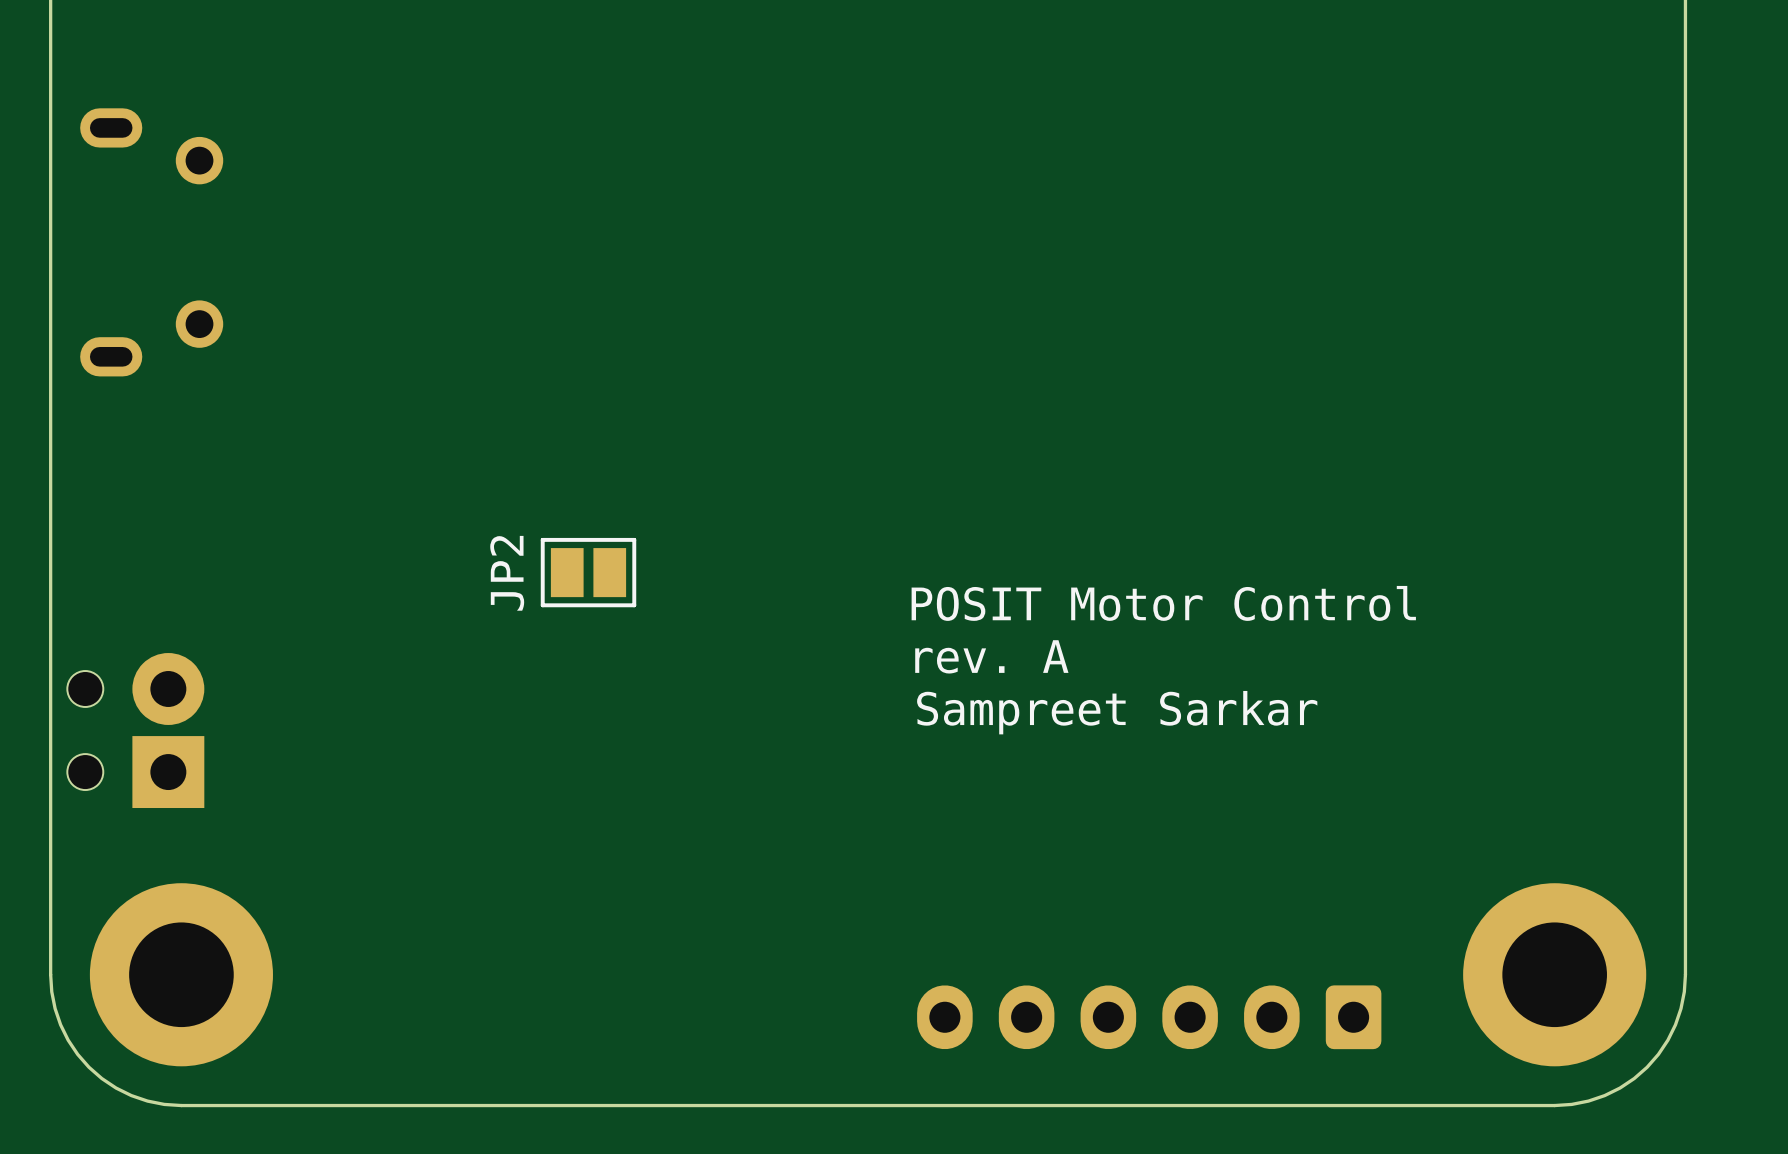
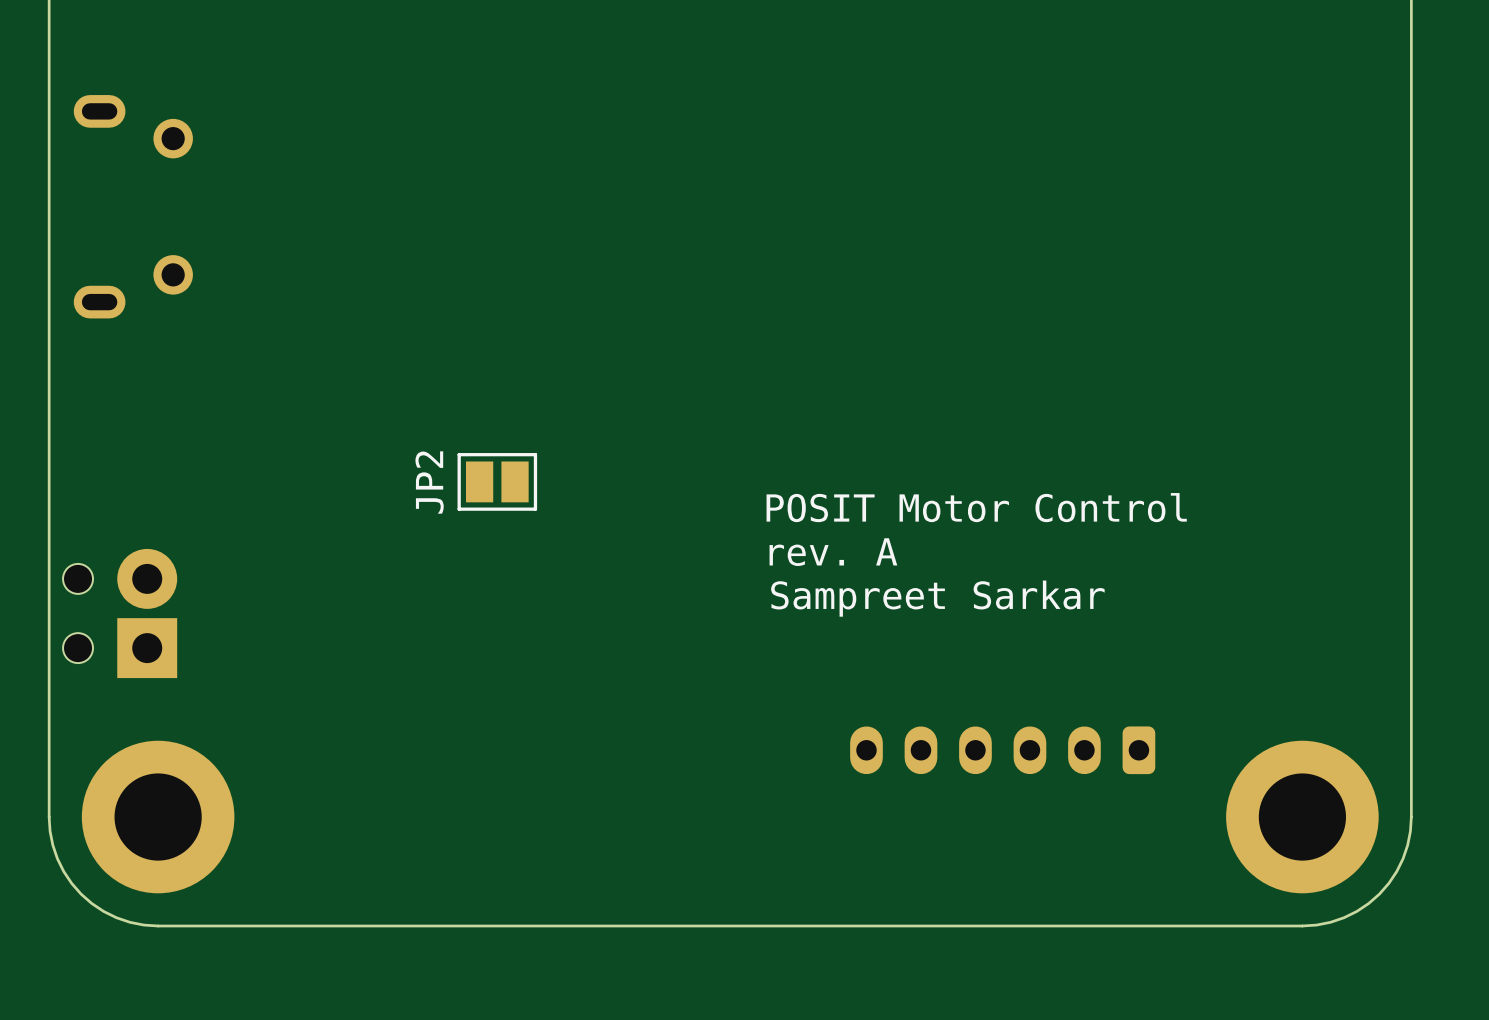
part: none -> (1002, 750)
part: (1149, 1017) -> none

